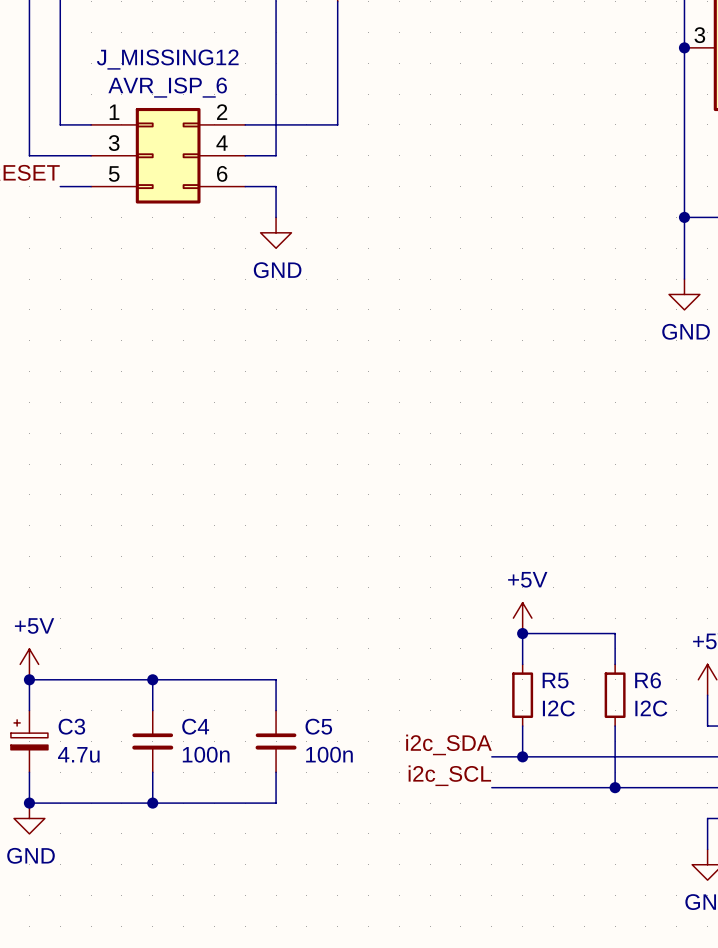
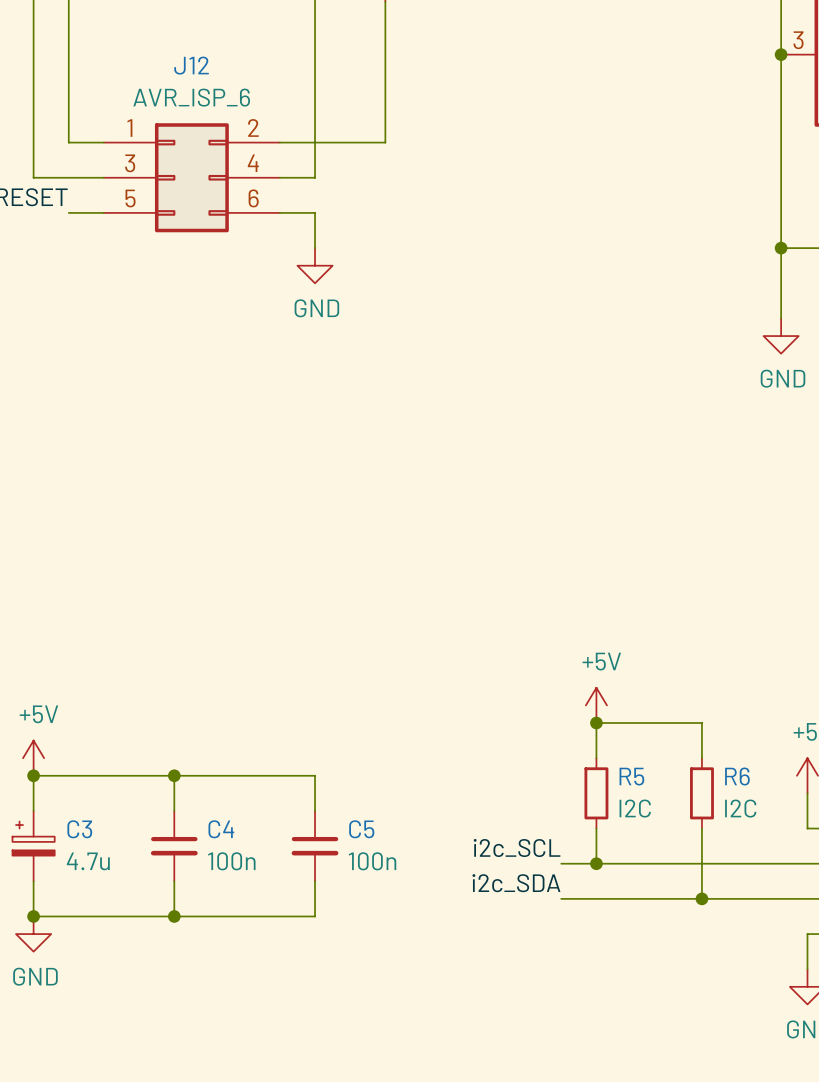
J_MISSING12 name: J_MISSING12 (167, 59) -> J12 (191, 65)
label: i2c_SDA (448, 744) -> i2c_SCL (517, 848)
label: i2c_SCL (449, 775) -> i2c_SDA (516, 883)

